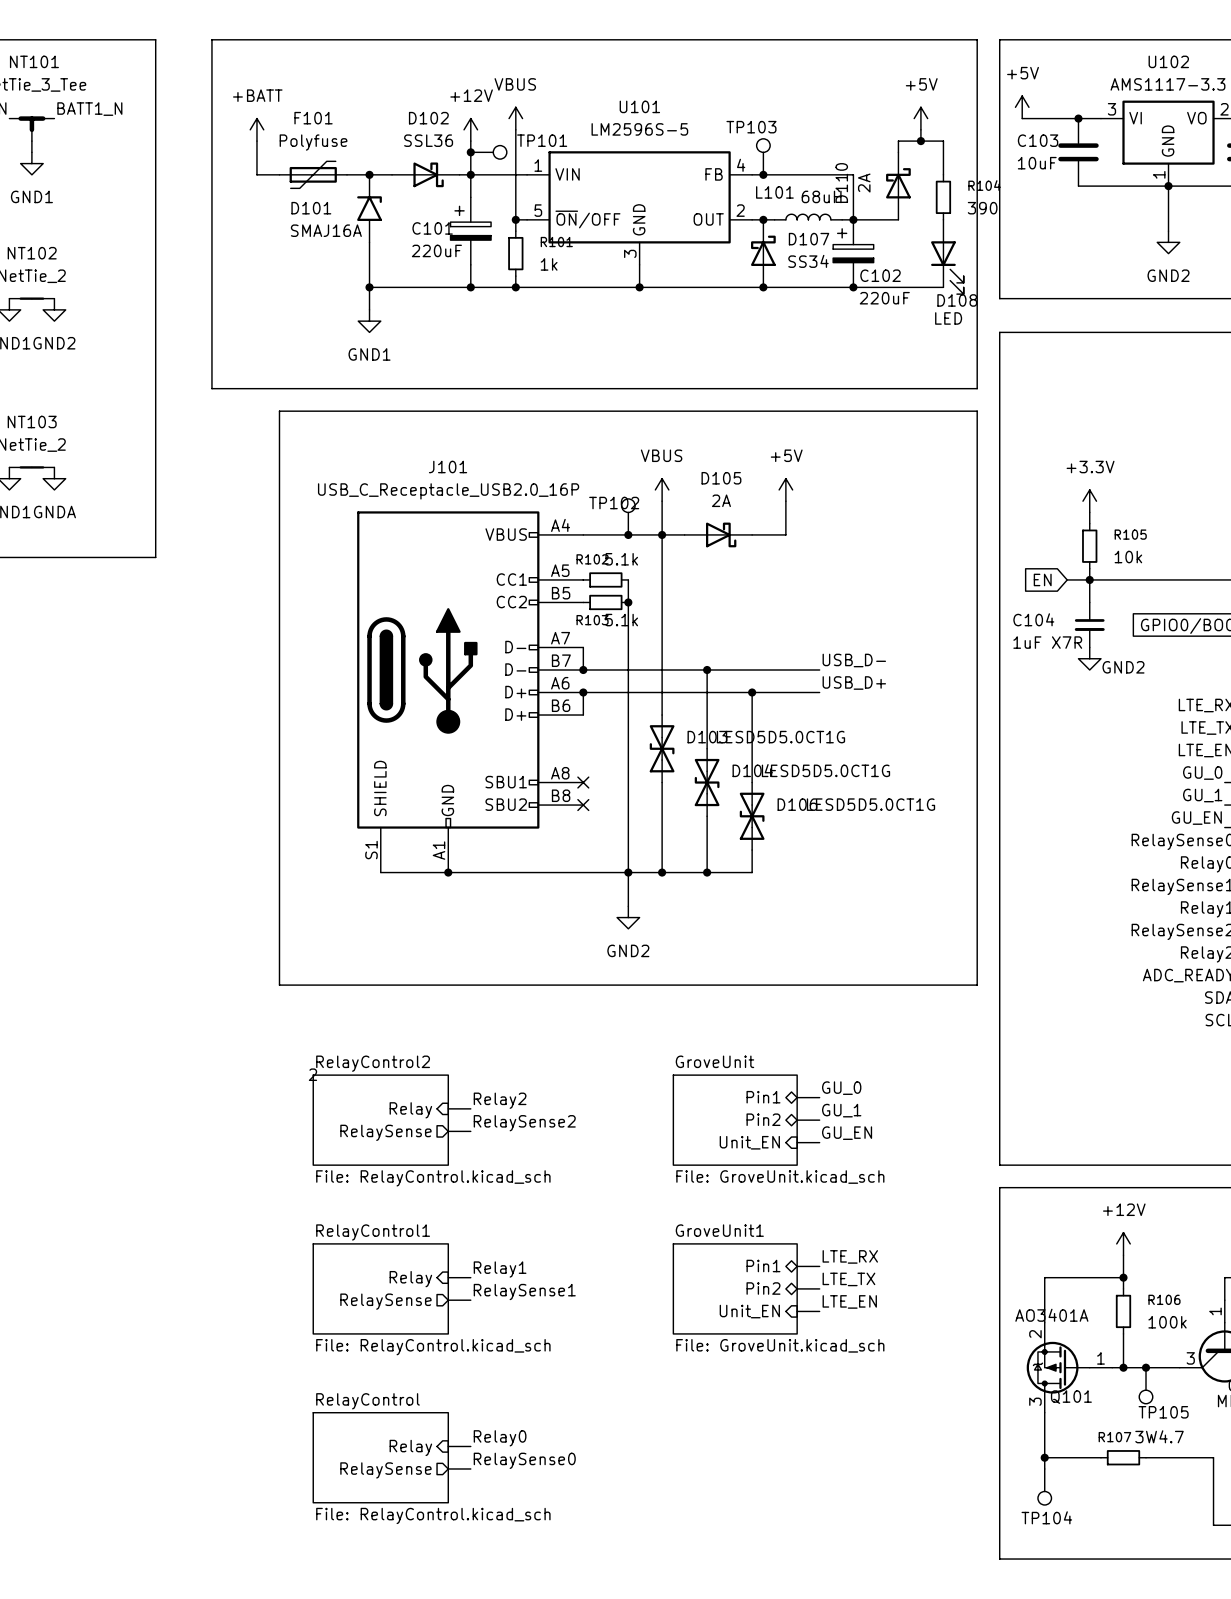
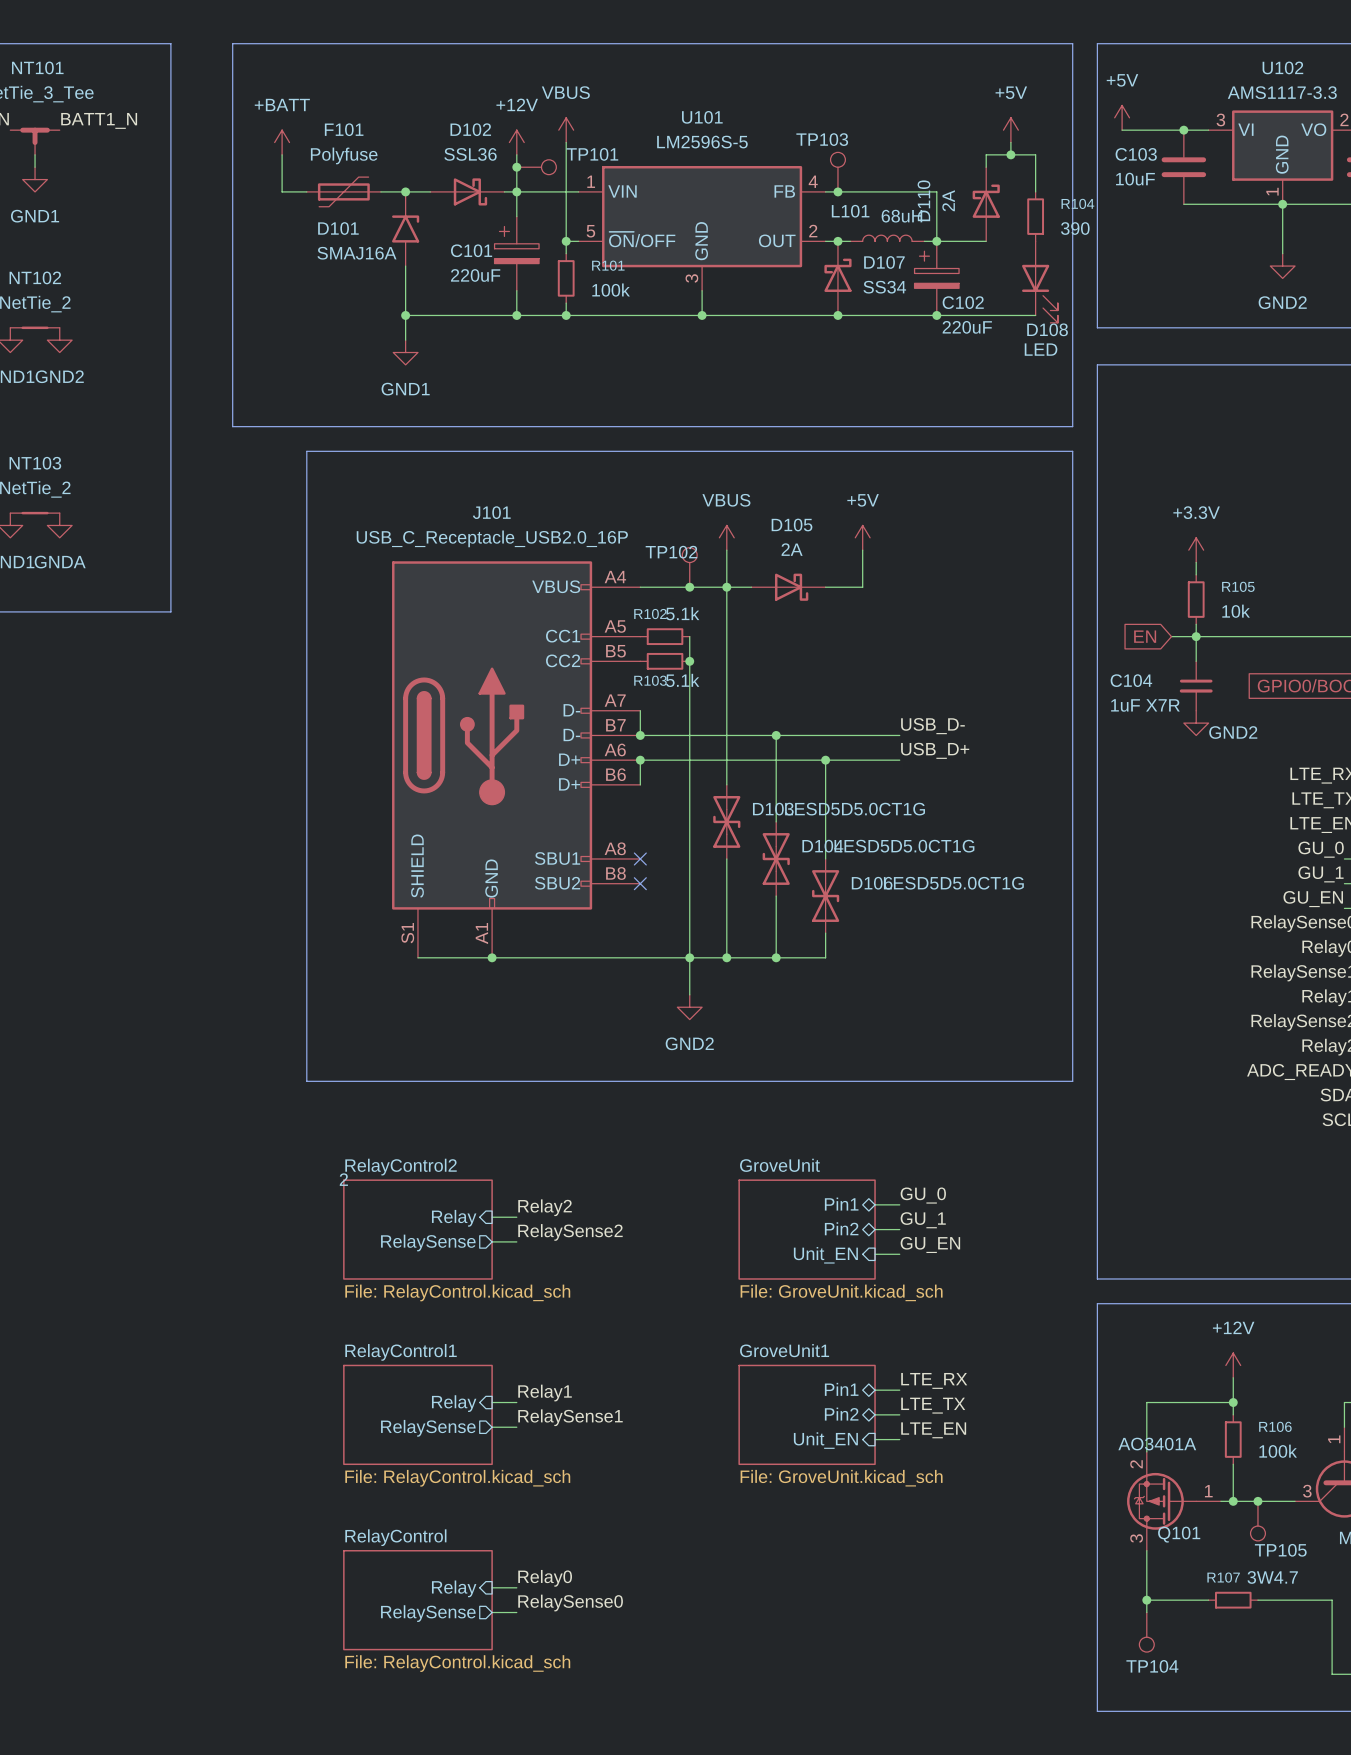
R101 value: 1k (549, 264) -> 100k (611, 290)

